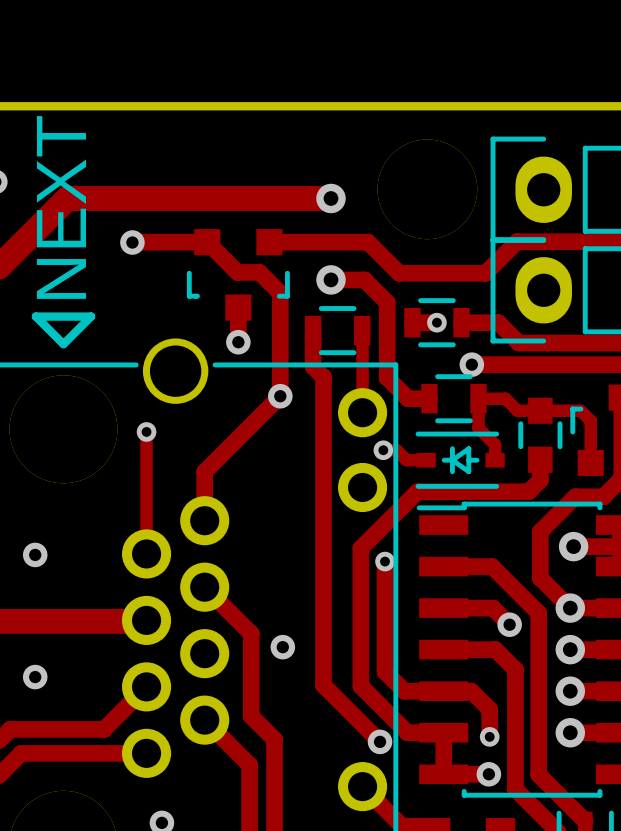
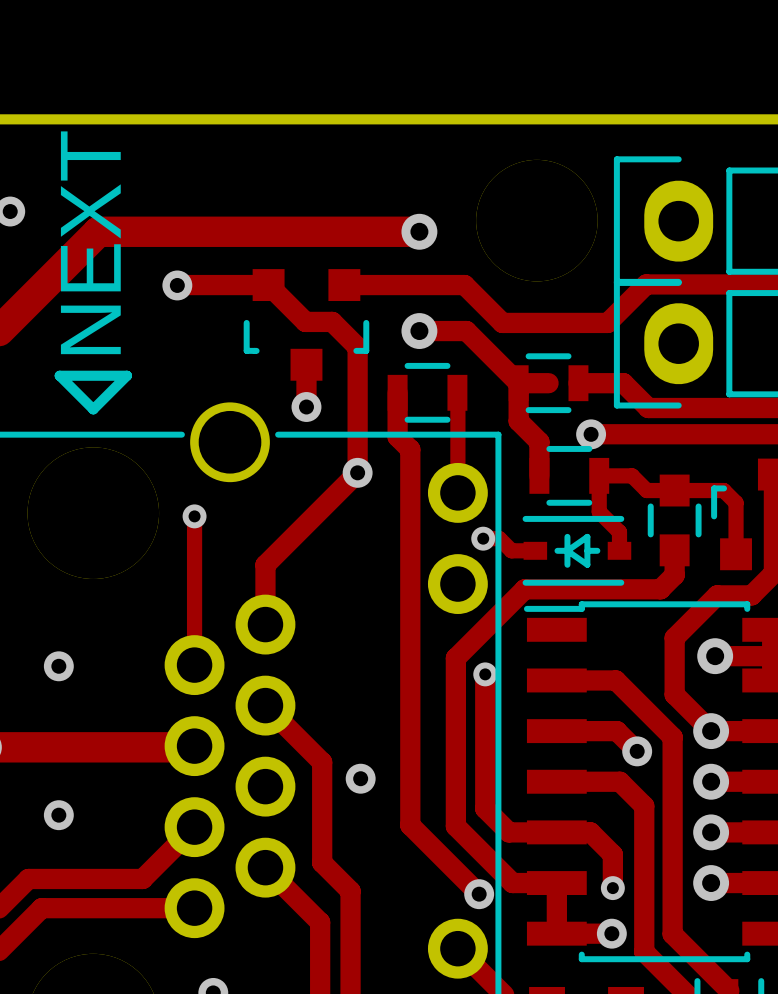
track: (364, 279) (387, 302) (387, 377) (408, 398) (429, 398) -> (460, 331) (466, 331) (518, 383) (518, 421) (539, 441) (539, 475)
via: (436, 322) -> none

